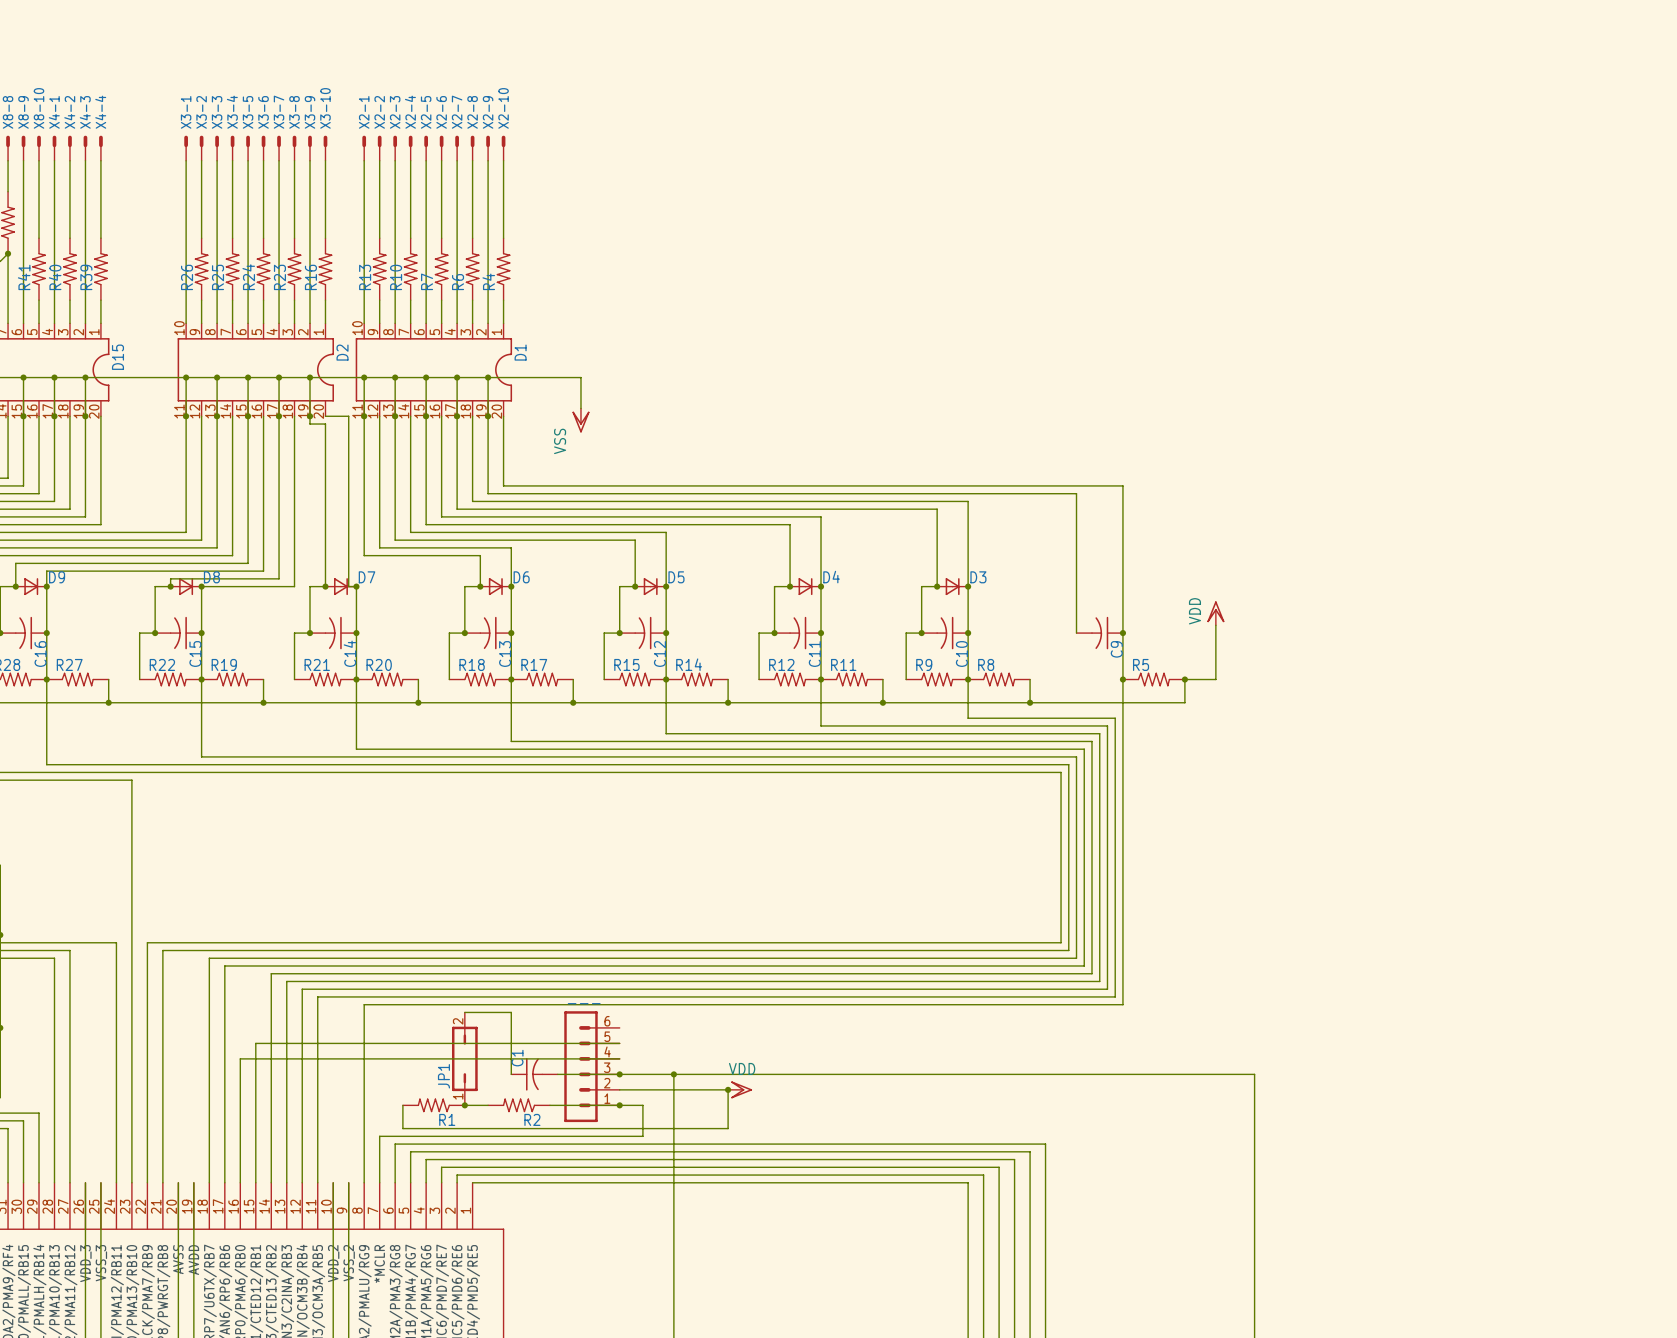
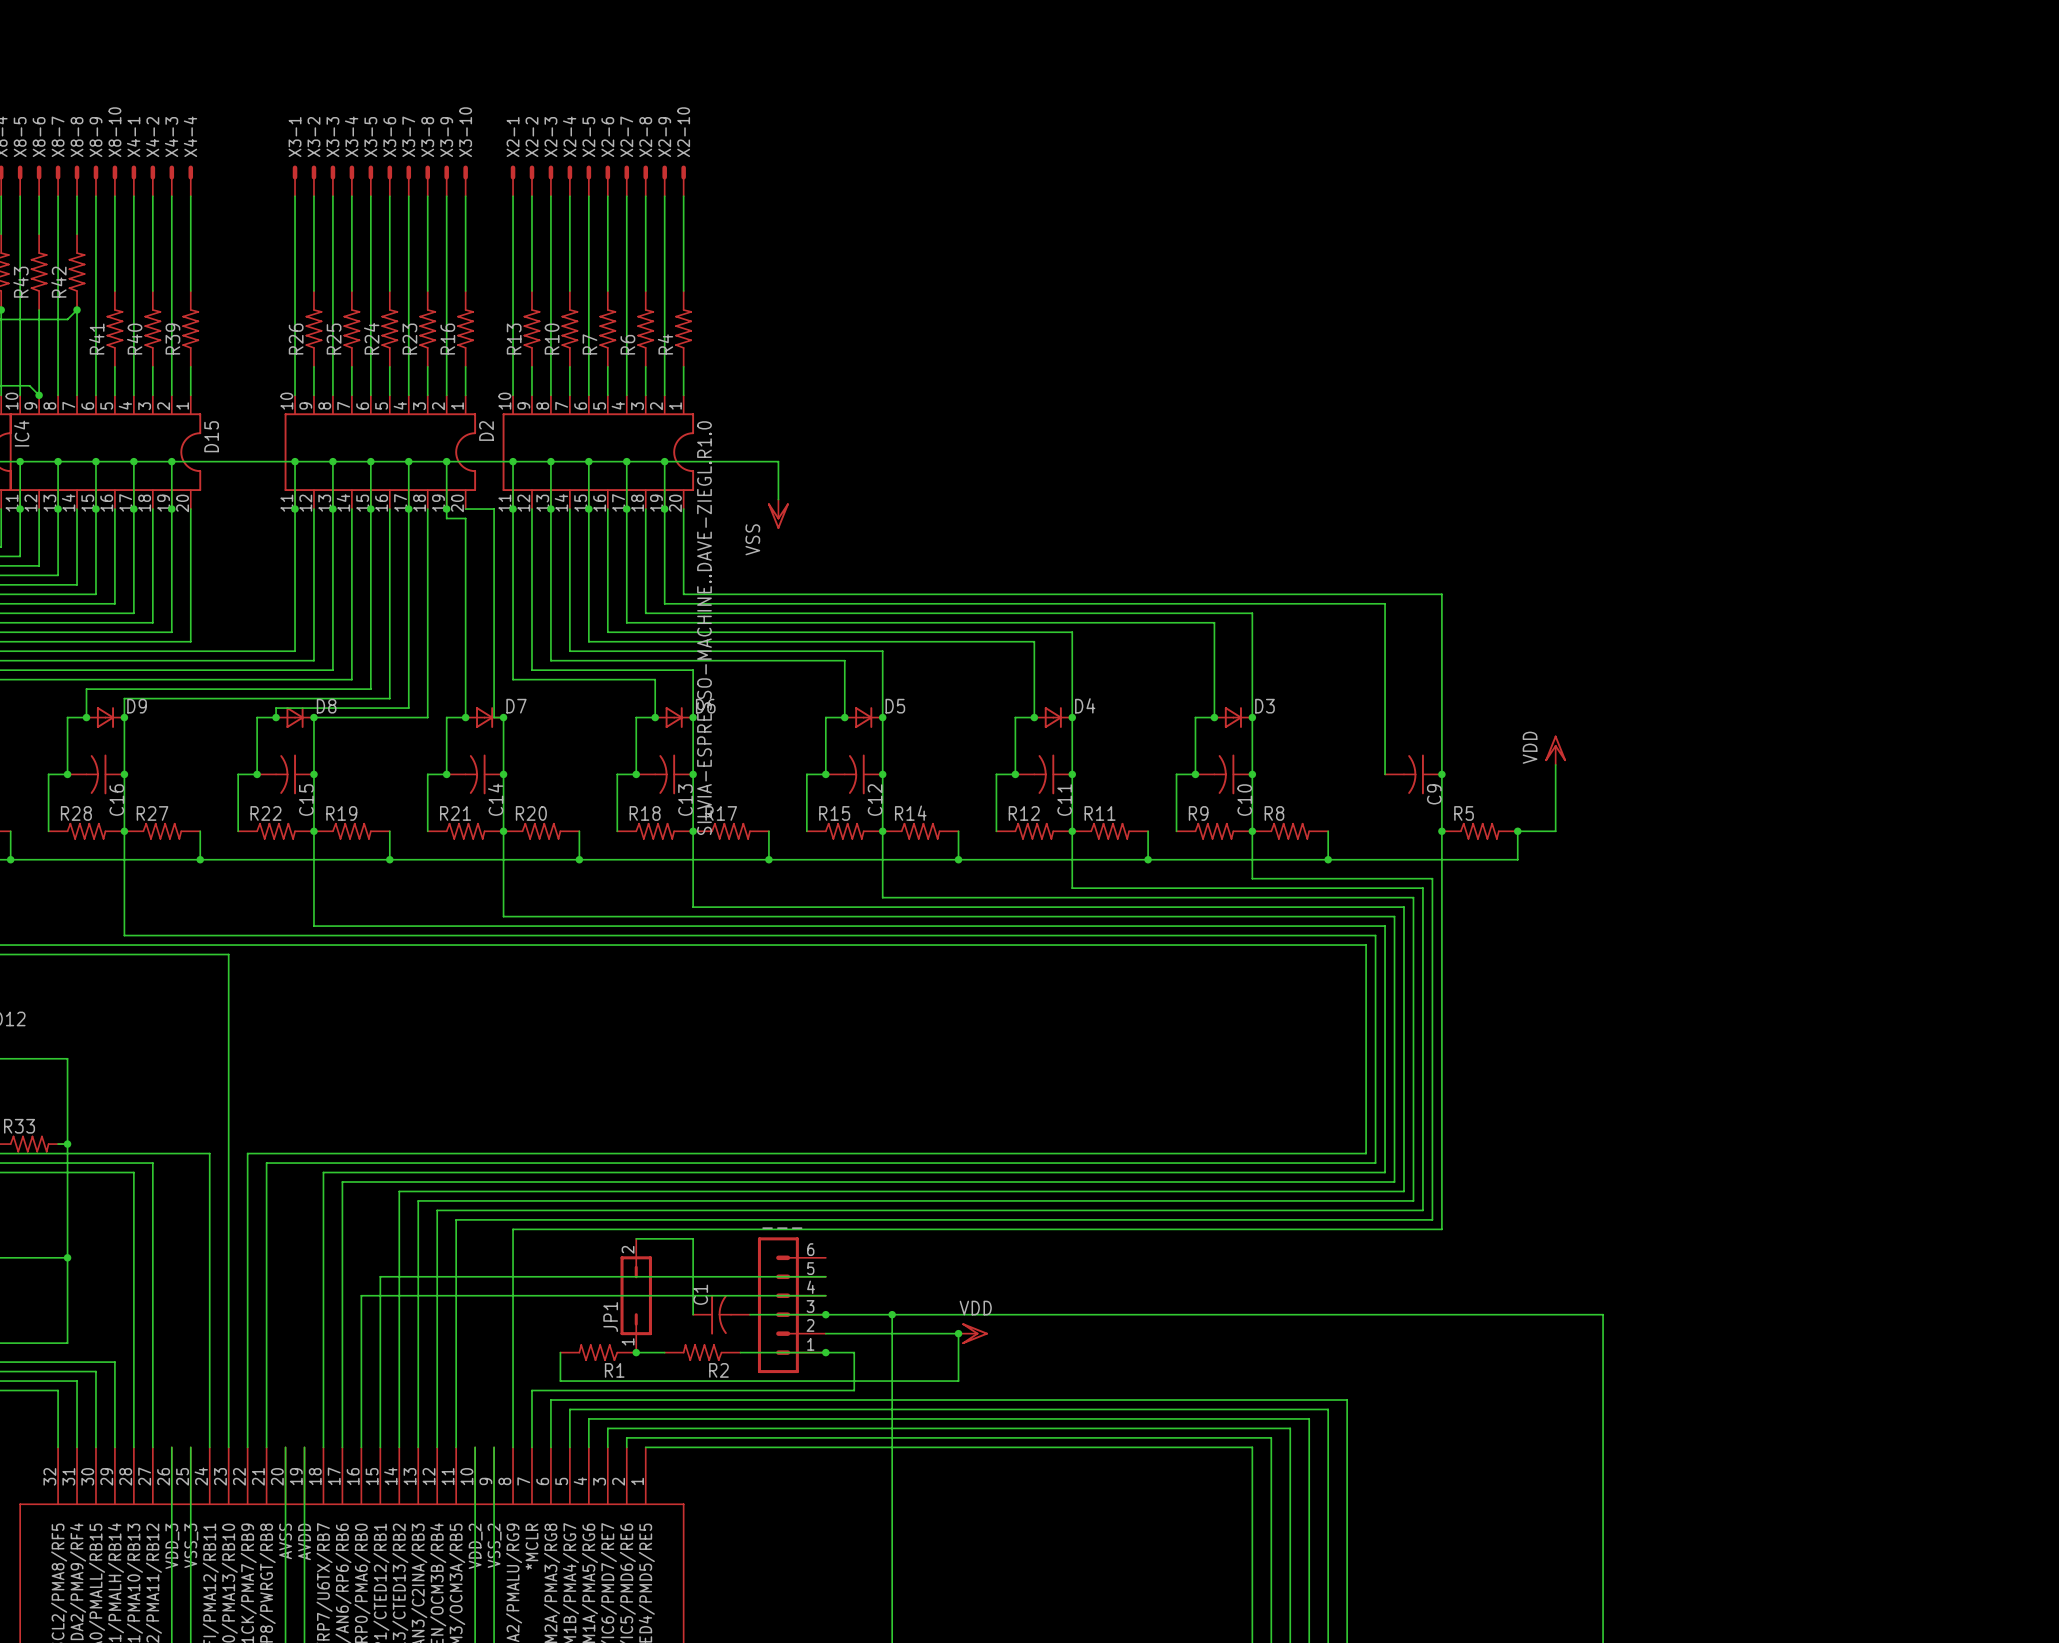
D1 name: D1 (520, 352) -> SILVIA-ESPRESSO-MACHINE..DAVE-ZIEGL.R1.0 (704, 628)

